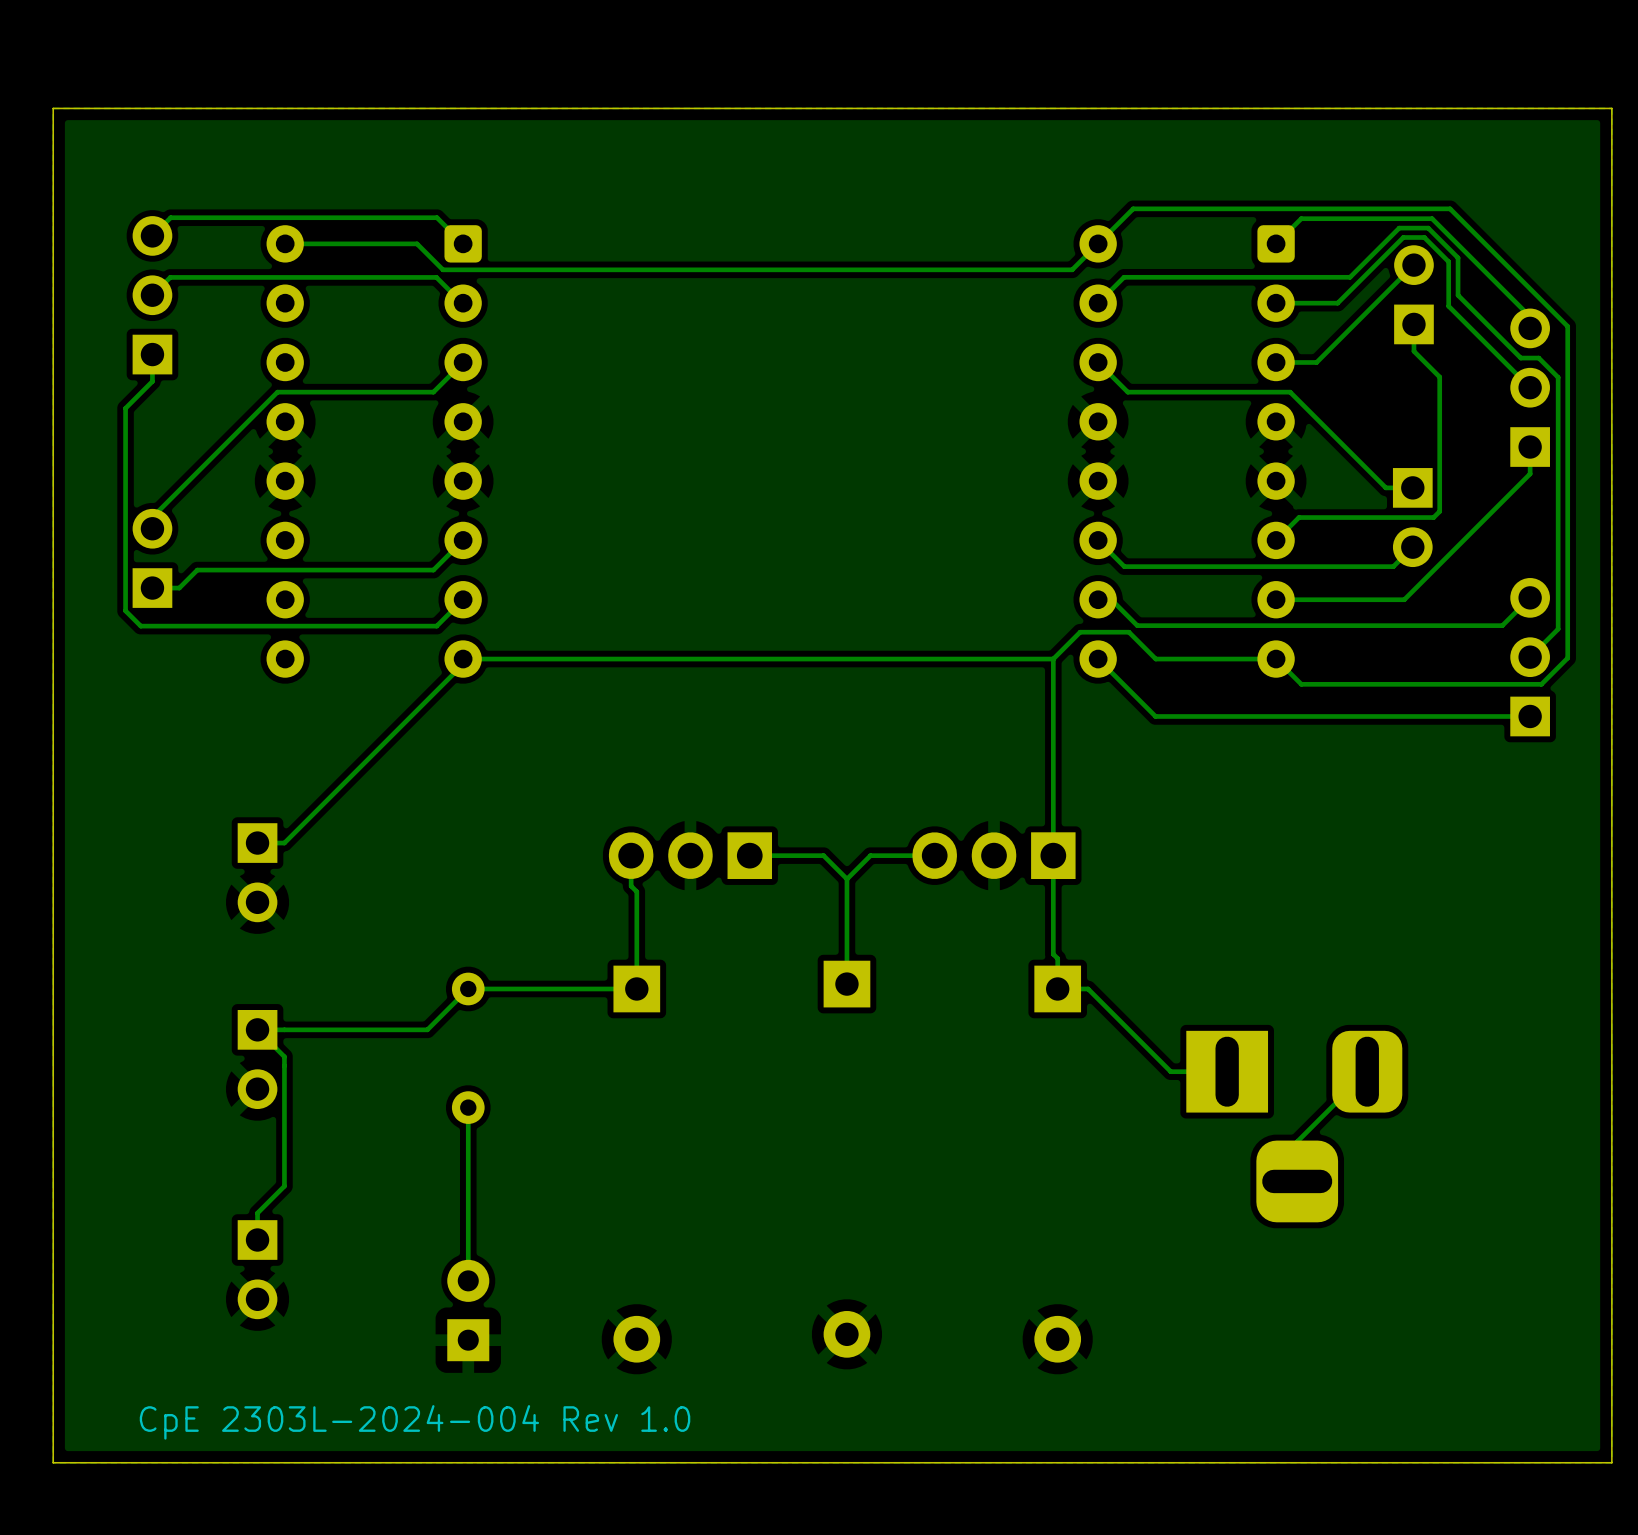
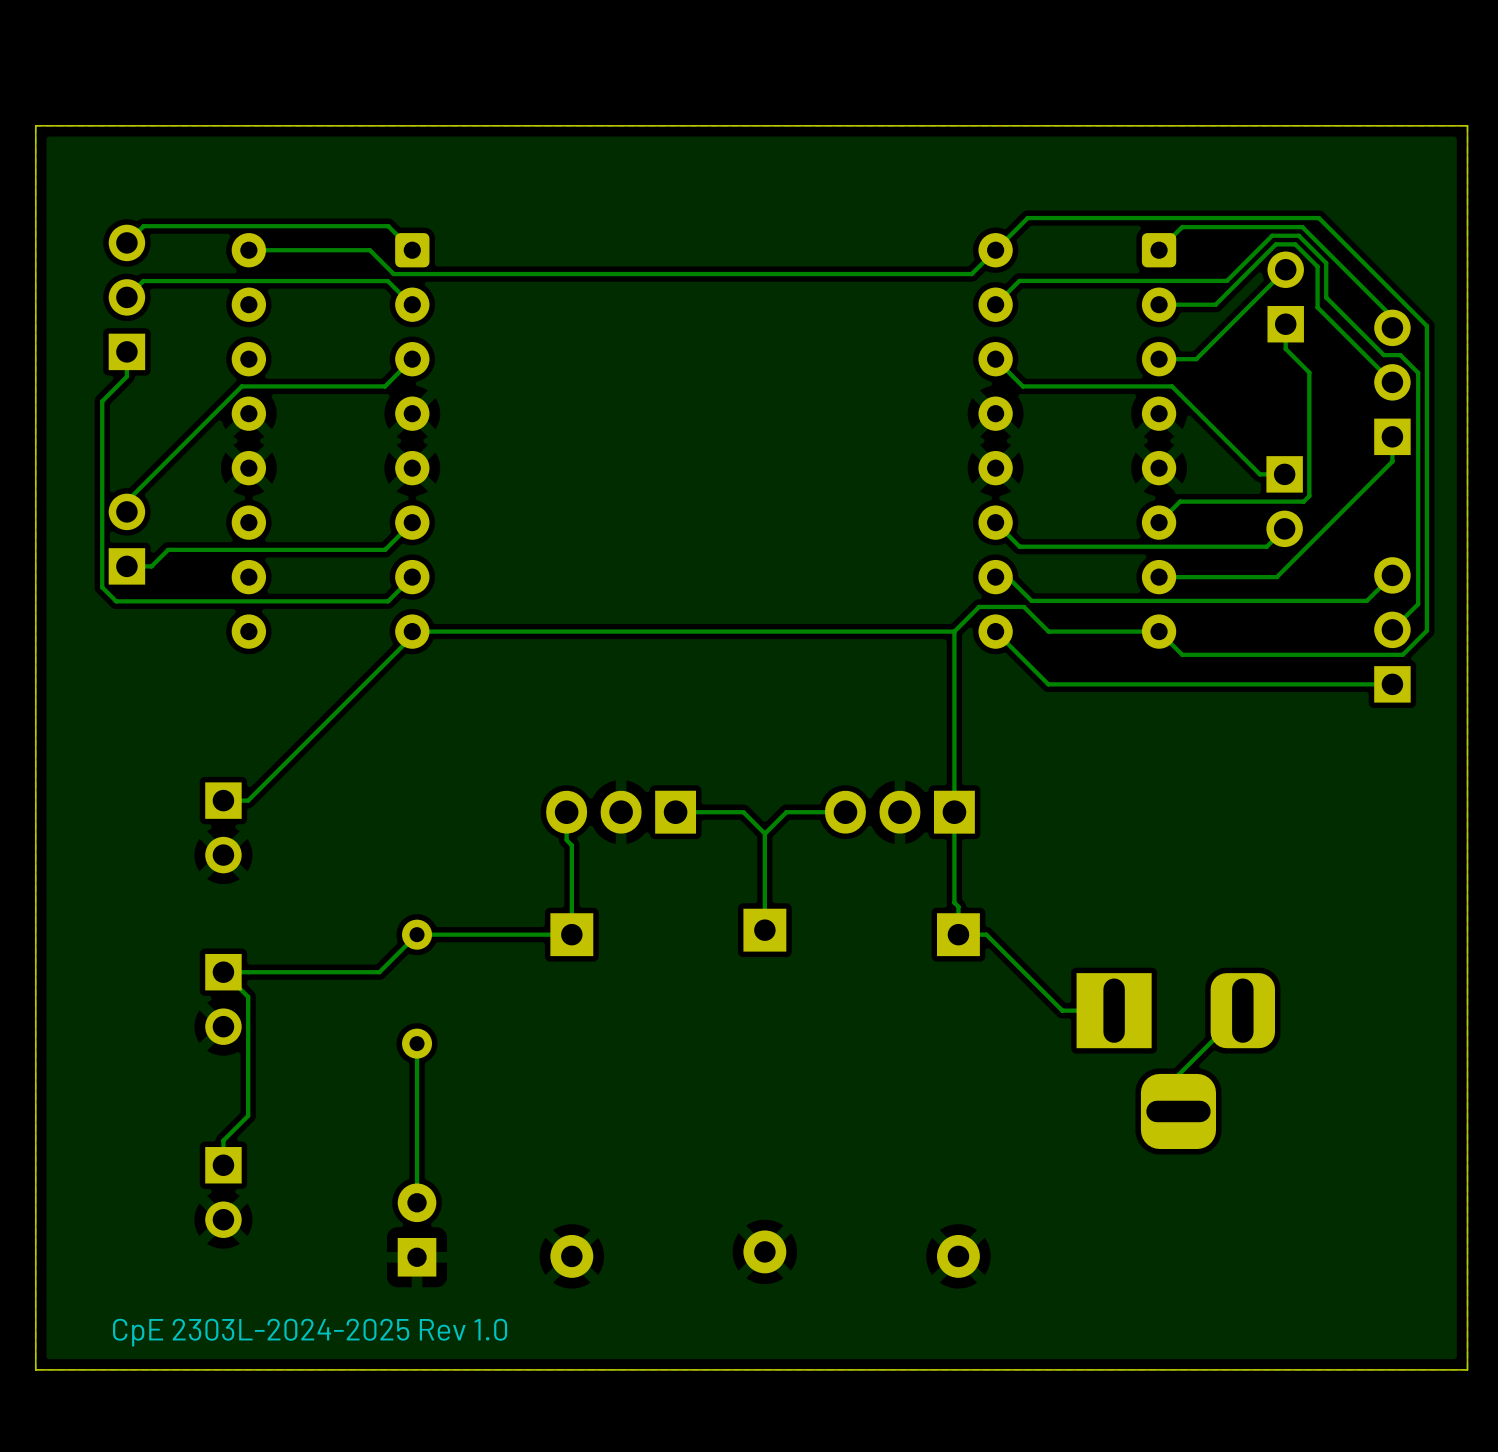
text: CpE 2303L-2024-004 Rev 1.0 (415, 1422) -> CpE 2303L-2024-2025 Rev 1.0 (310, 1332)

